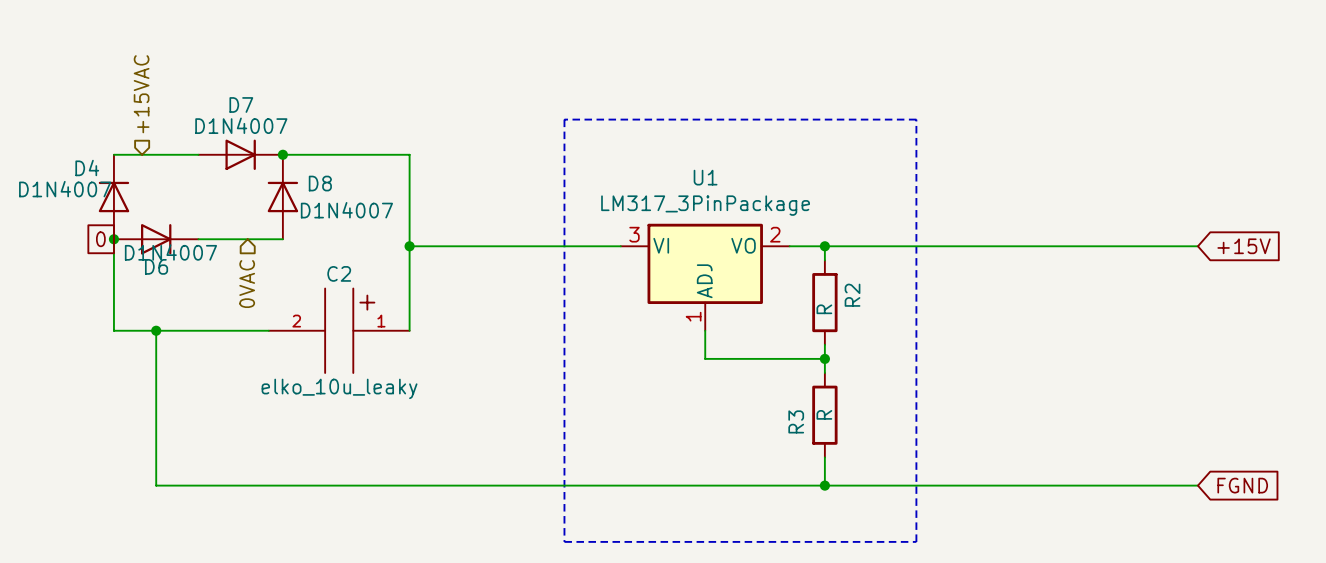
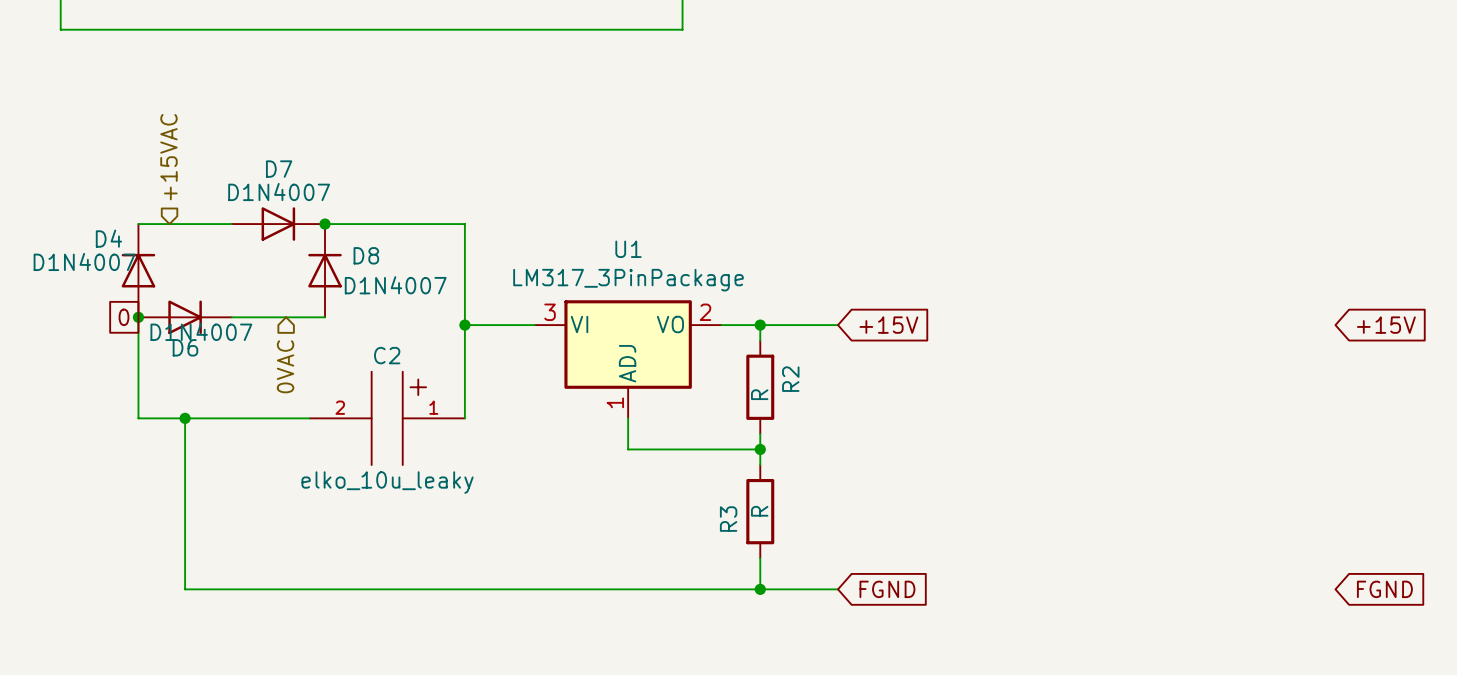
line: (564, 119) (564, 541) (916, 541) (916, 119) (564, 119) -> none
junction: none -> (760, 325)
wire: (789, 246) (1197, 246) -> none
global label: none -> +15V (888, 325)
junction: (824, 246) -> none
U1 position: (705, 277) -> (628, 359)
R2 position: (824, 302) -> (760, 387)
wire: (705, 330) (705, 358) (824, 358) -> (628, 418) (628, 449) (760, 449)
wire: (824, 344) (824, 372) -> (760, 433) (760, 465)
junction: none -> (760, 449)
junction: (824, 358) -> none
R3 position: (824, 415) -> (760, 511)
wire: (824, 457) (824, 485) -> (760, 558) (760, 589)
junction: none -> (760, 589)
wire: (747, 485) (1197, 485) -> none
global label: none -> FGND (887, 589)
junction: (824, 485) -> none

